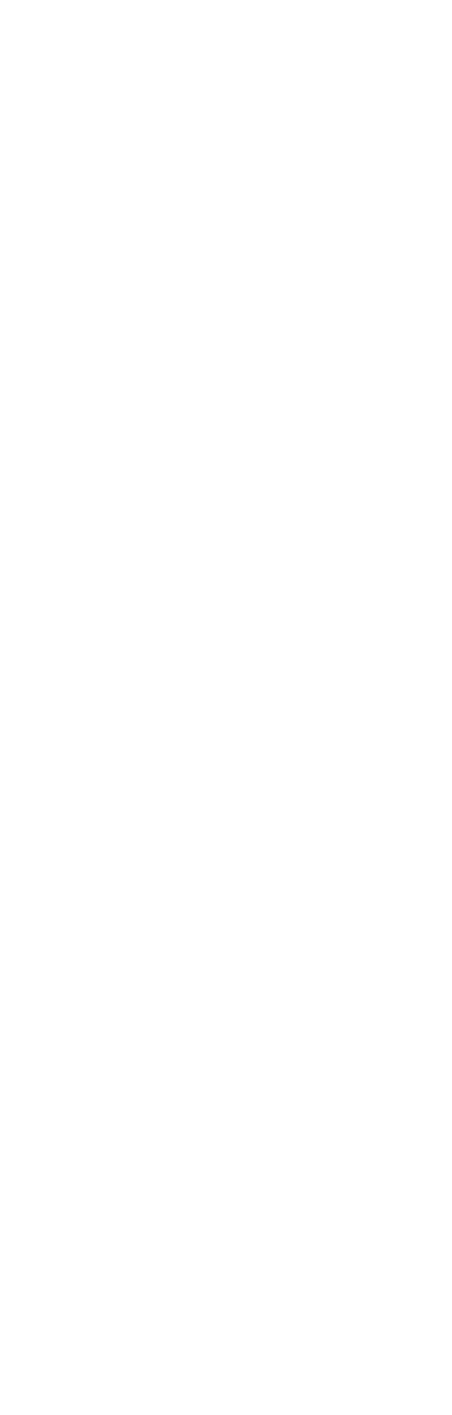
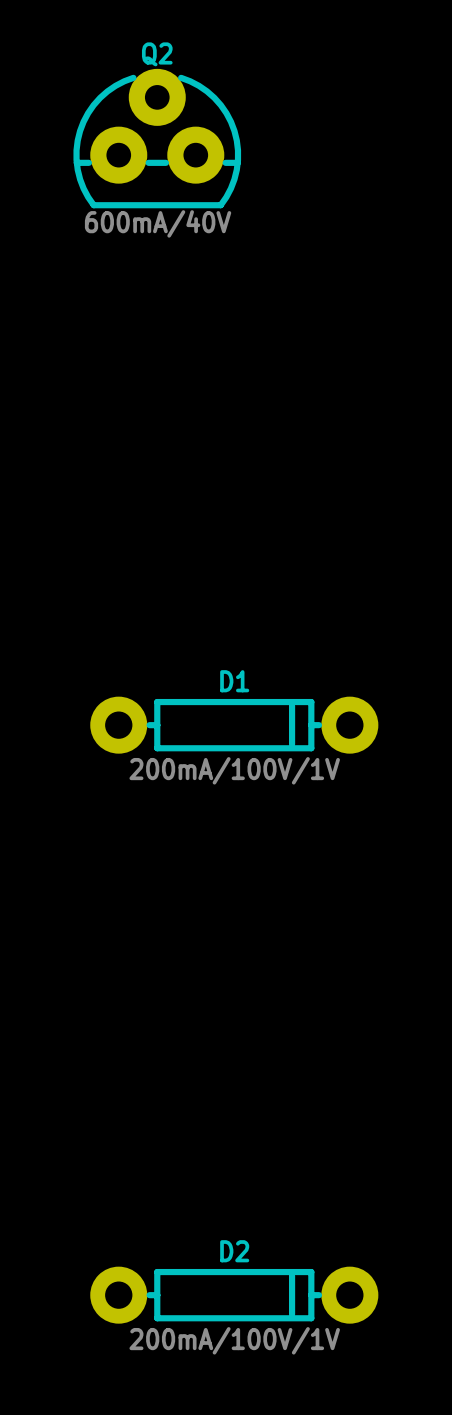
Q2: none -> 600mA/40V (157, 138)
D1: none -> 200mA/100V/1V (234, 725)
D2: none -> 200mA/100V/1V (234, 1295)

